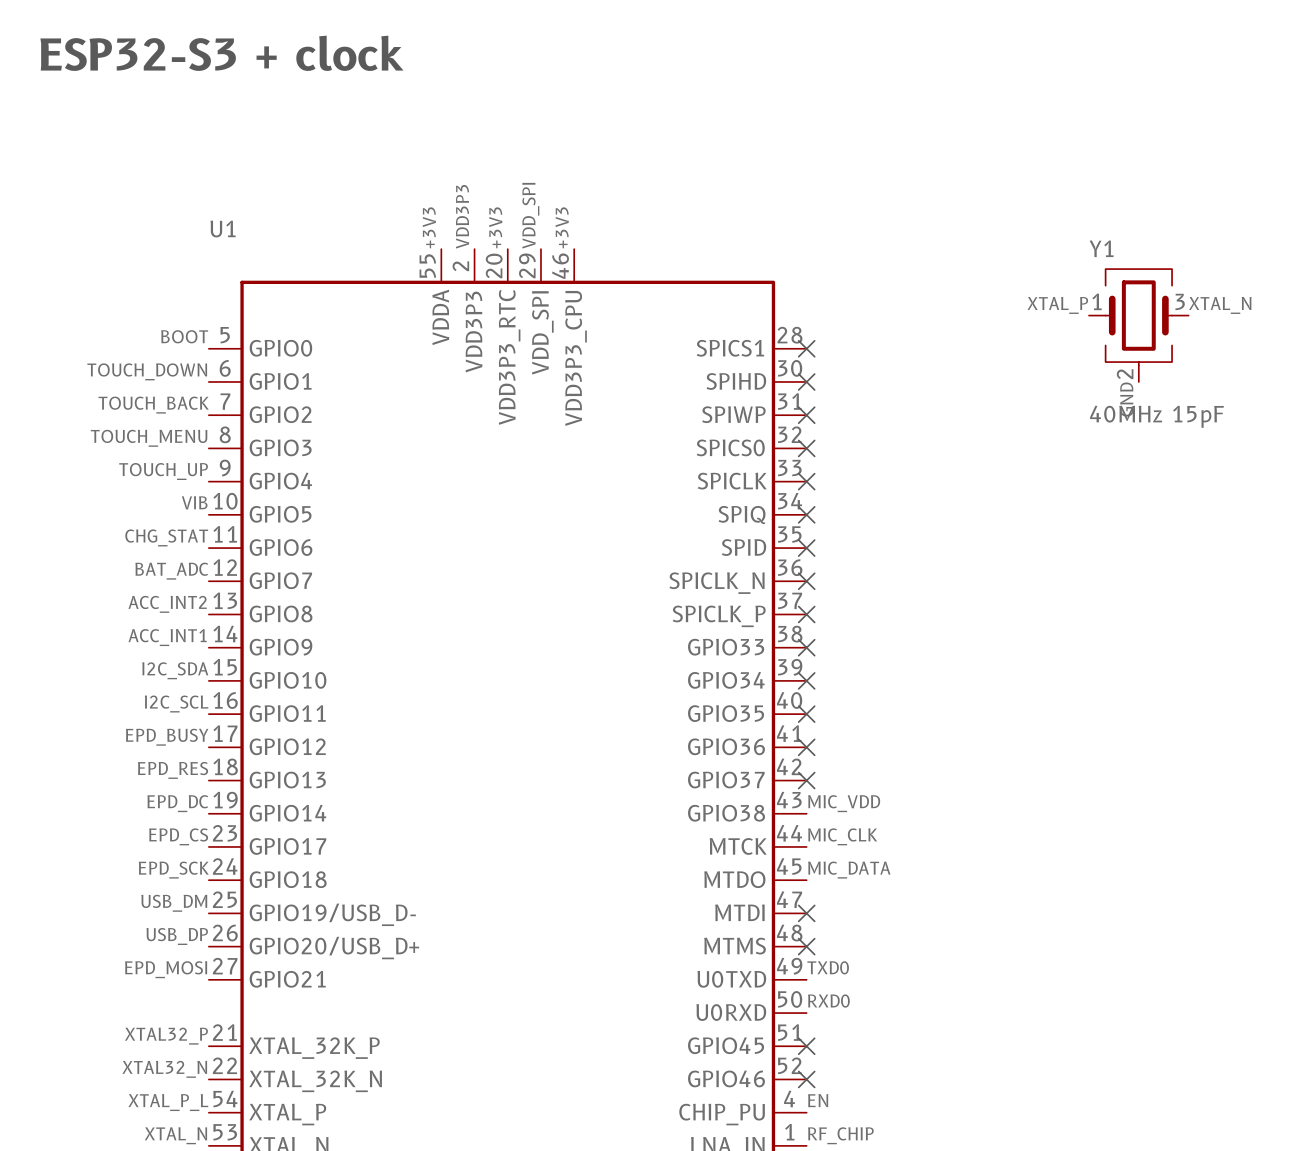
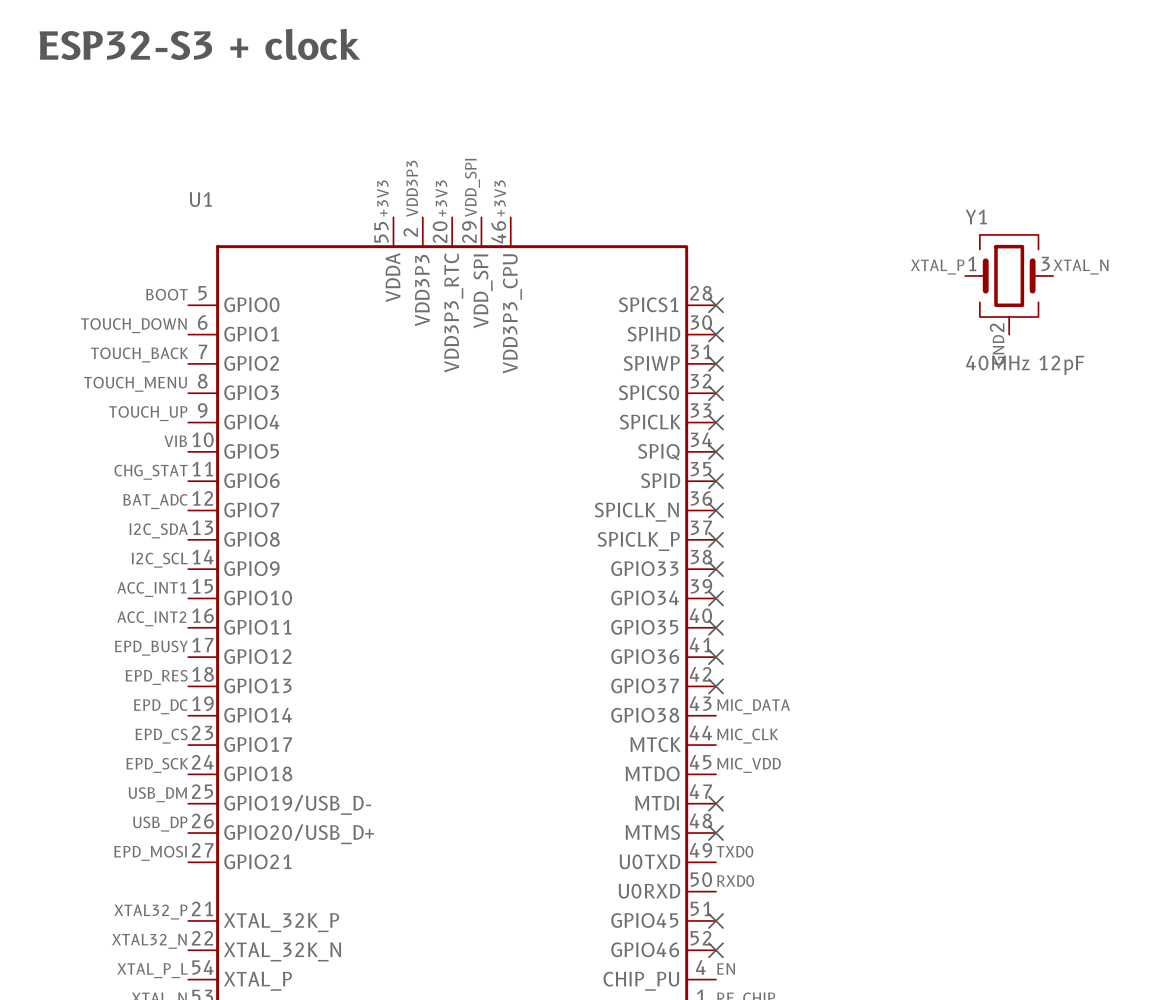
Y1 value: 40MHz 15pF (1156, 416) -> 40MHz 12pF (1025, 365)
label: ACC_INT2 (167, 604) -> I2C_SDA (158, 530)
label: ACC_INT1 (167, 637) -> I2C_SCL (159, 560)
label: I2C_SDA (175, 670) -> ACC_INT1 (151, 589)
label: I2C_SCL (176, 703) -> ACC_INT2 (151, 618)
label: MIC_VDD (844, 803) -> MIC_DATA (753, 706)
label: MIC_DATA (849, 870) -> MIC_VDD (749, 765)

